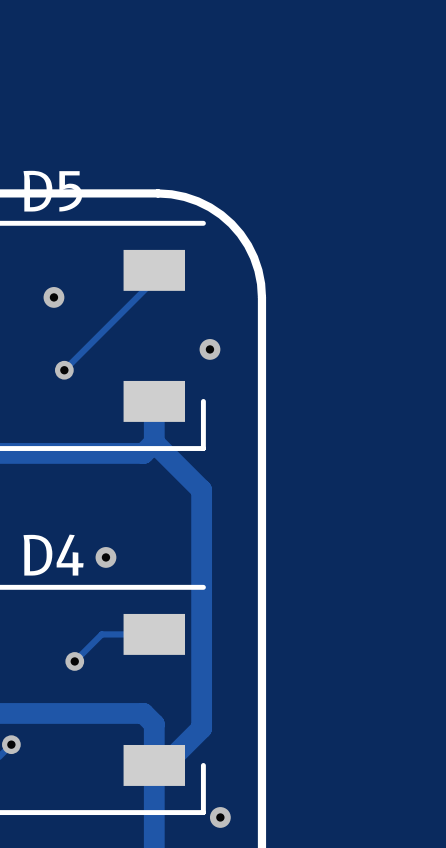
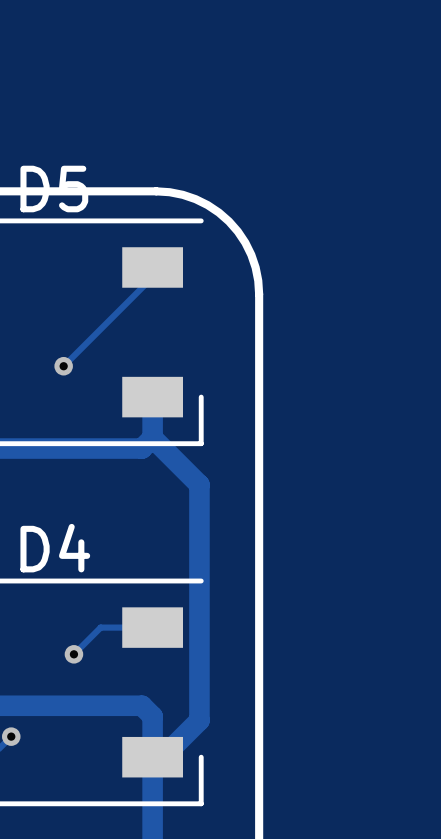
via: (53, 297) -> none
via: (209, 349) -> none
via: (105, 557) -> none
via: (220, 817) -> none

